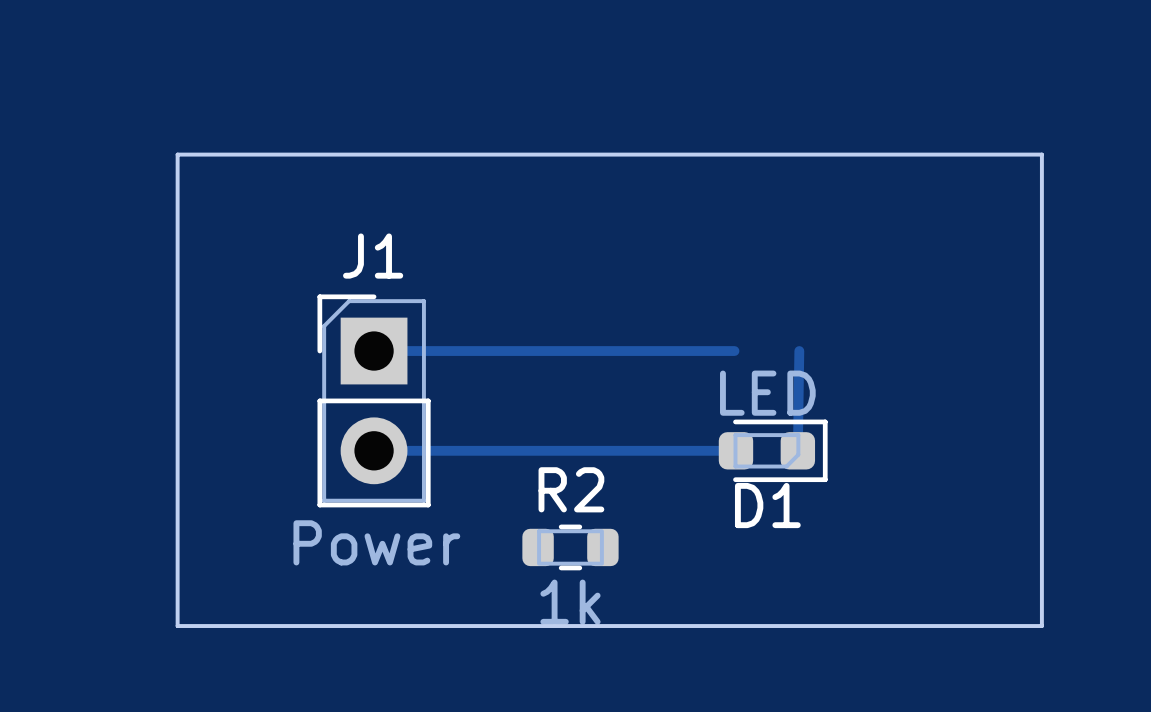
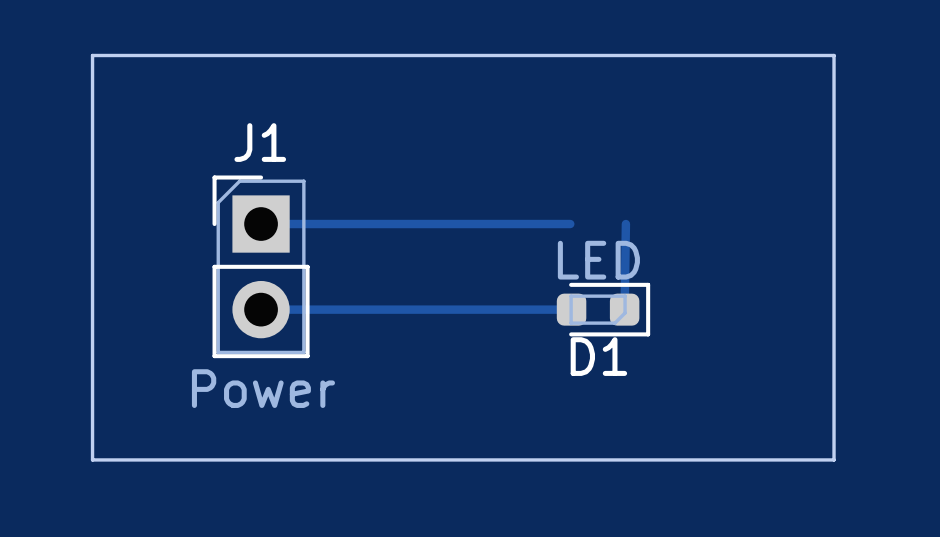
R2: 1k (570, 547) -> none

